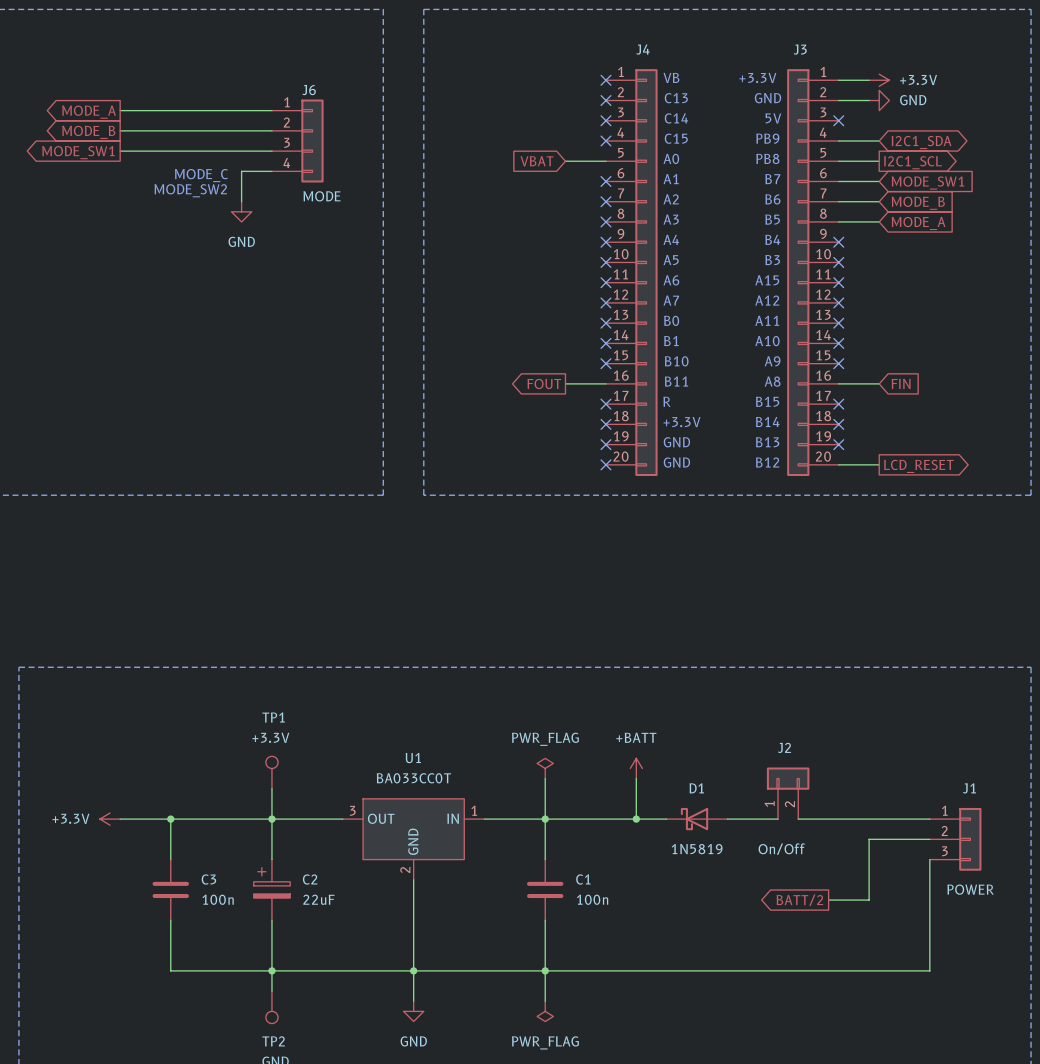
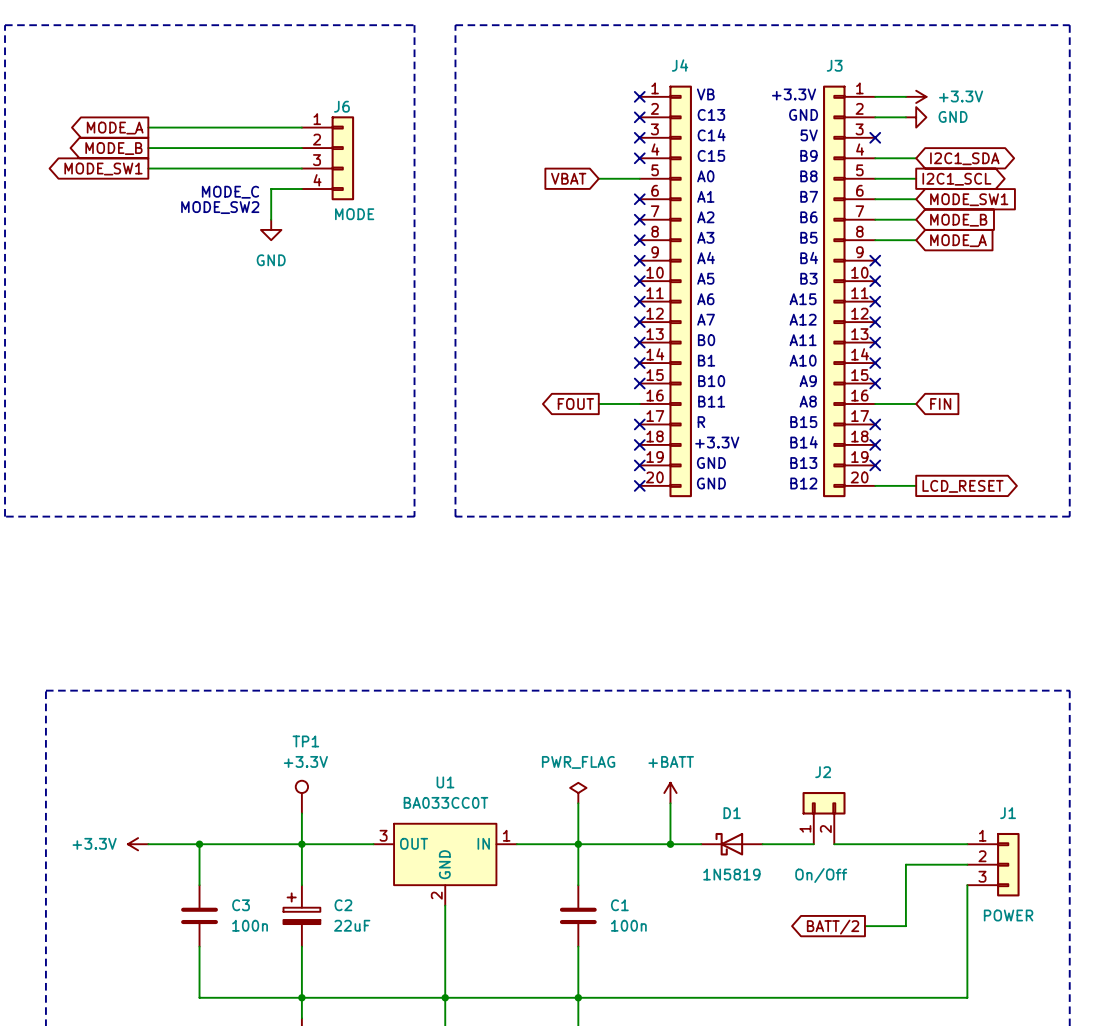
text: PB9 (767, 138) -> B9 (808, 155)
text: PB8 (767, 158) -> B8 (808, 176)

